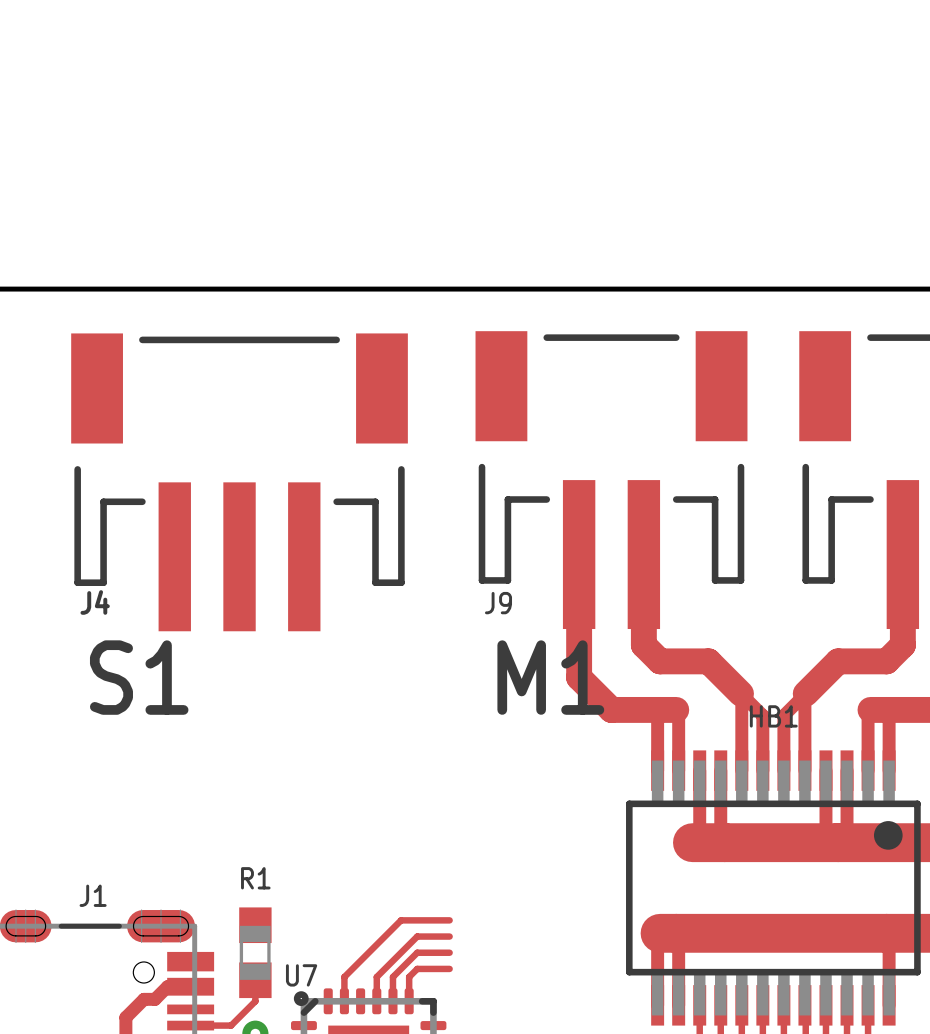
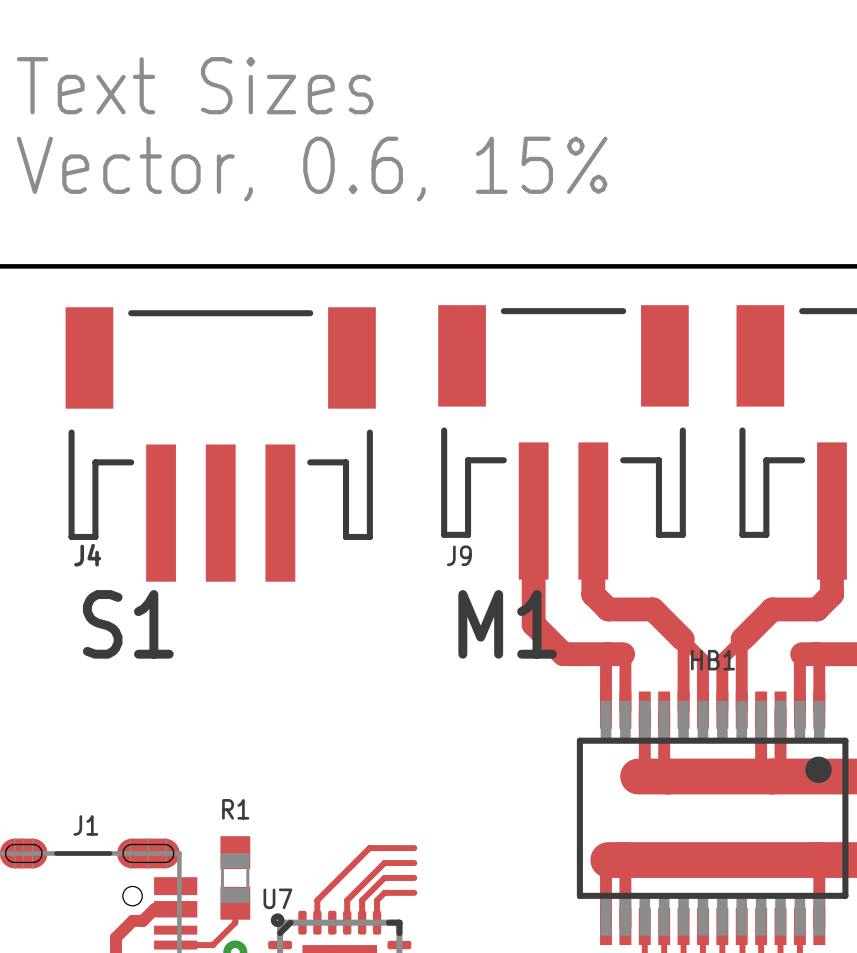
text: none -> Text Sizes (195, 85)
text: none -> Vector, 0.6, 15% (312, 169)

